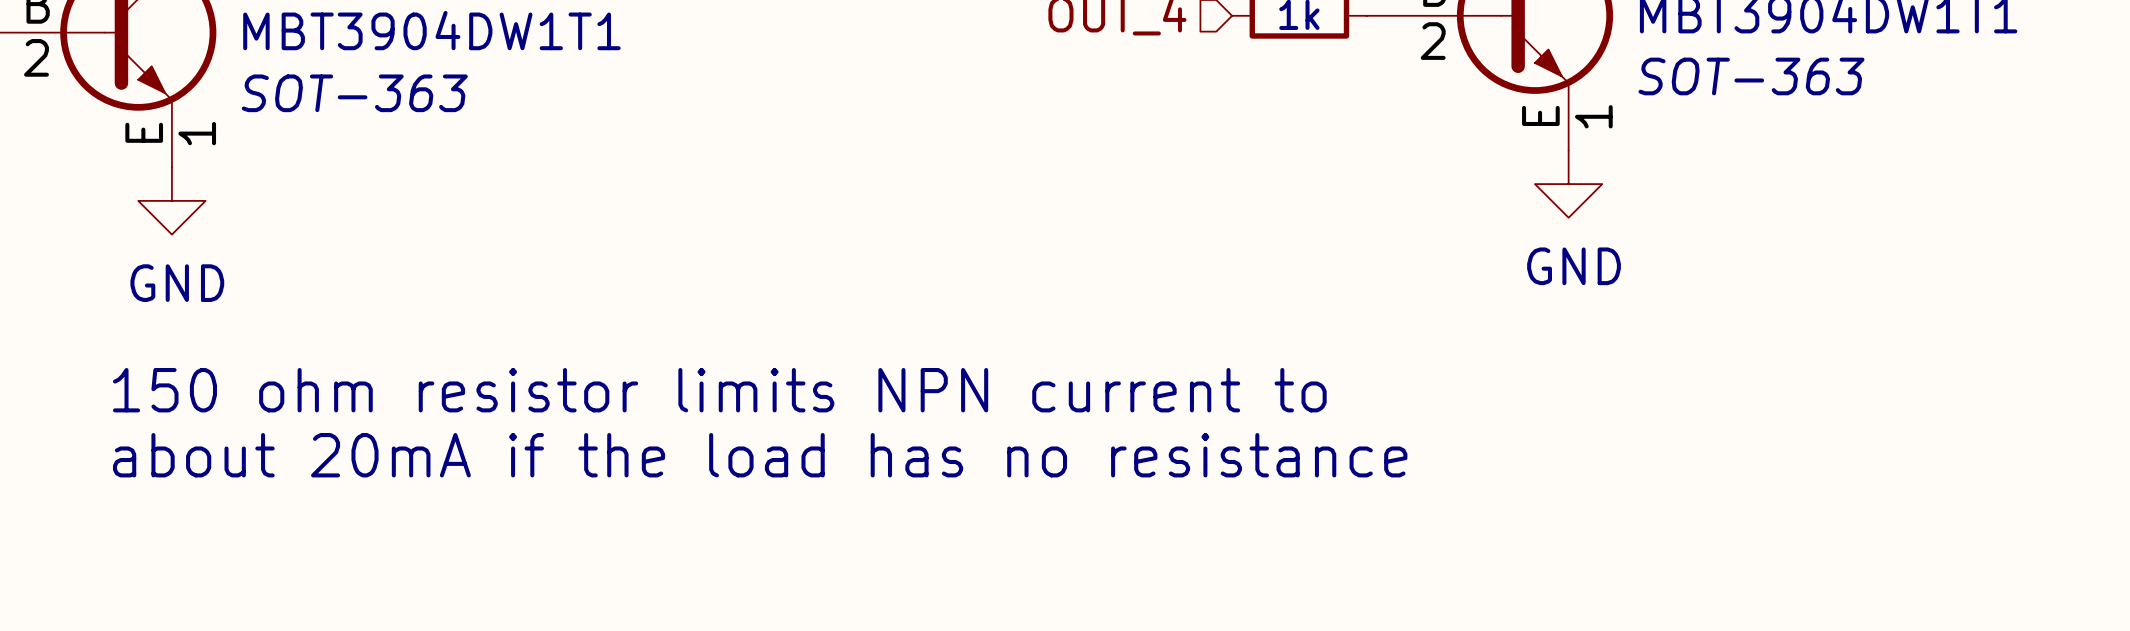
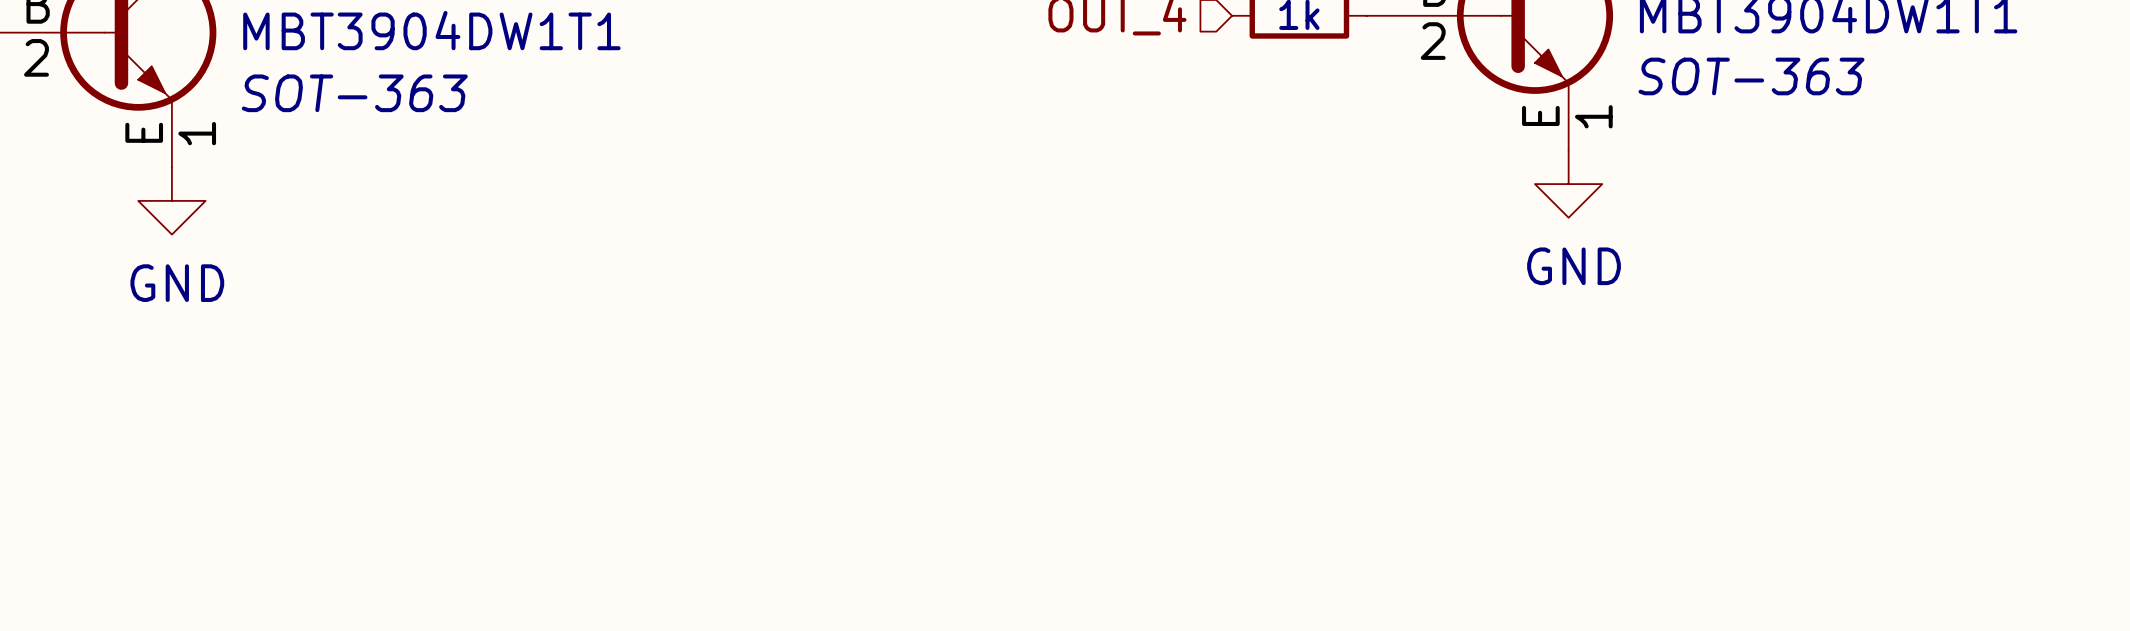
text: 150 ohm resistor limits NPN current to (719, 390) -> none
text: about 20mA if the load has no resistance (760, 455) -> none

